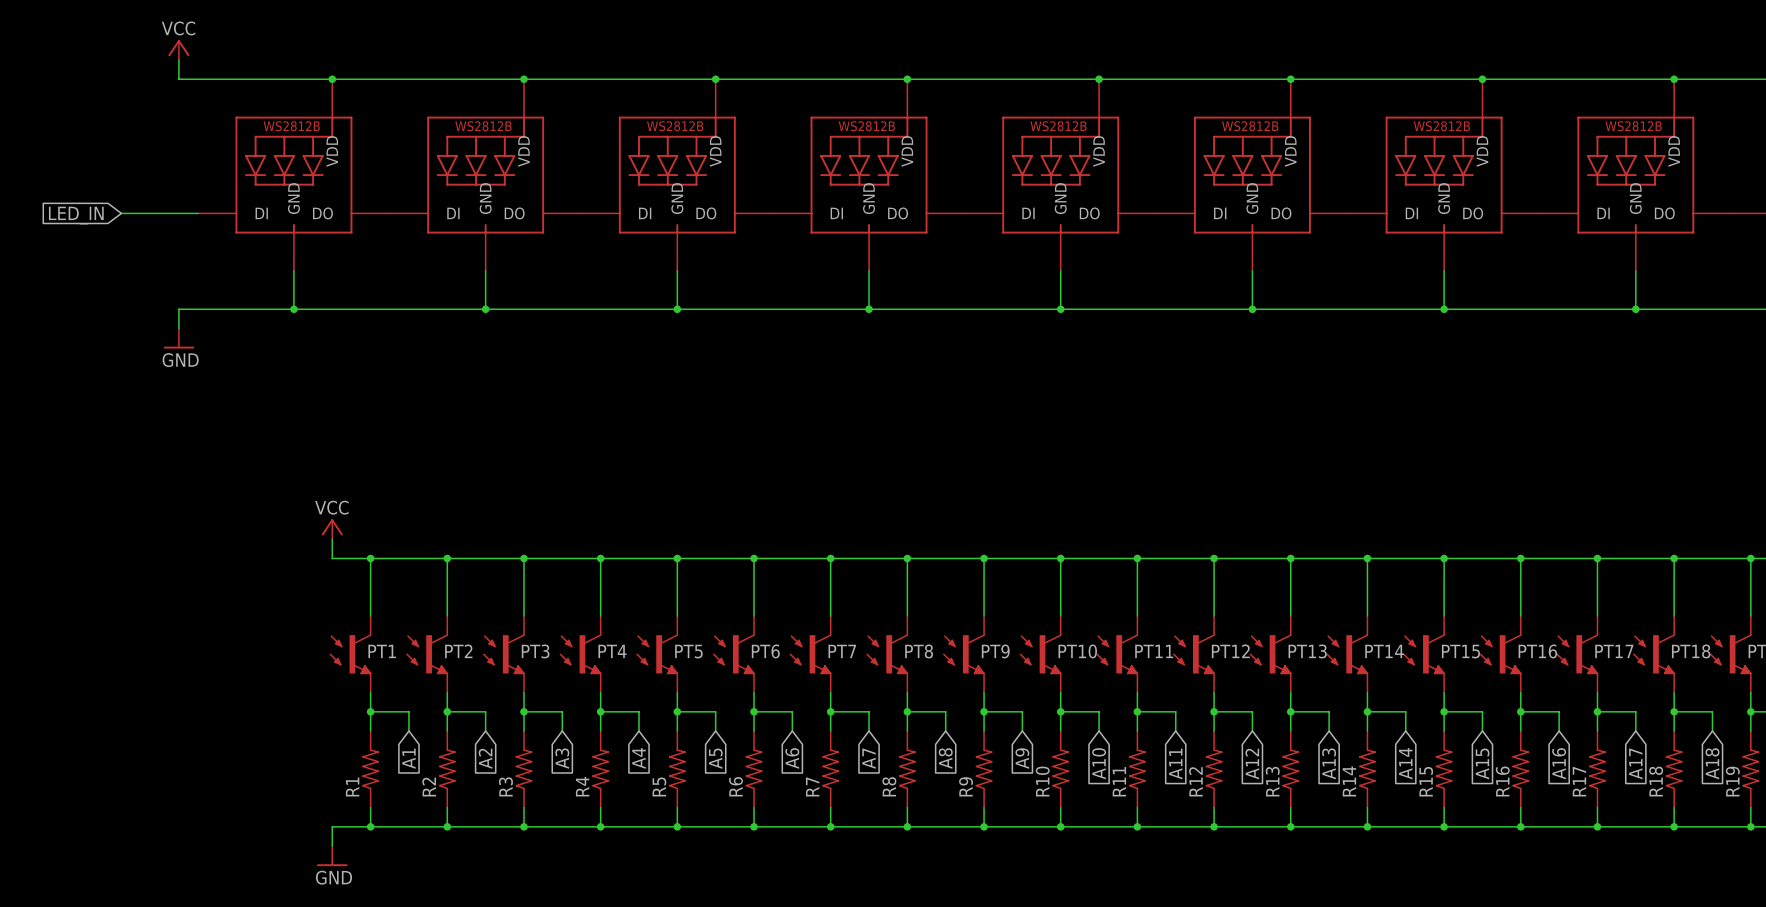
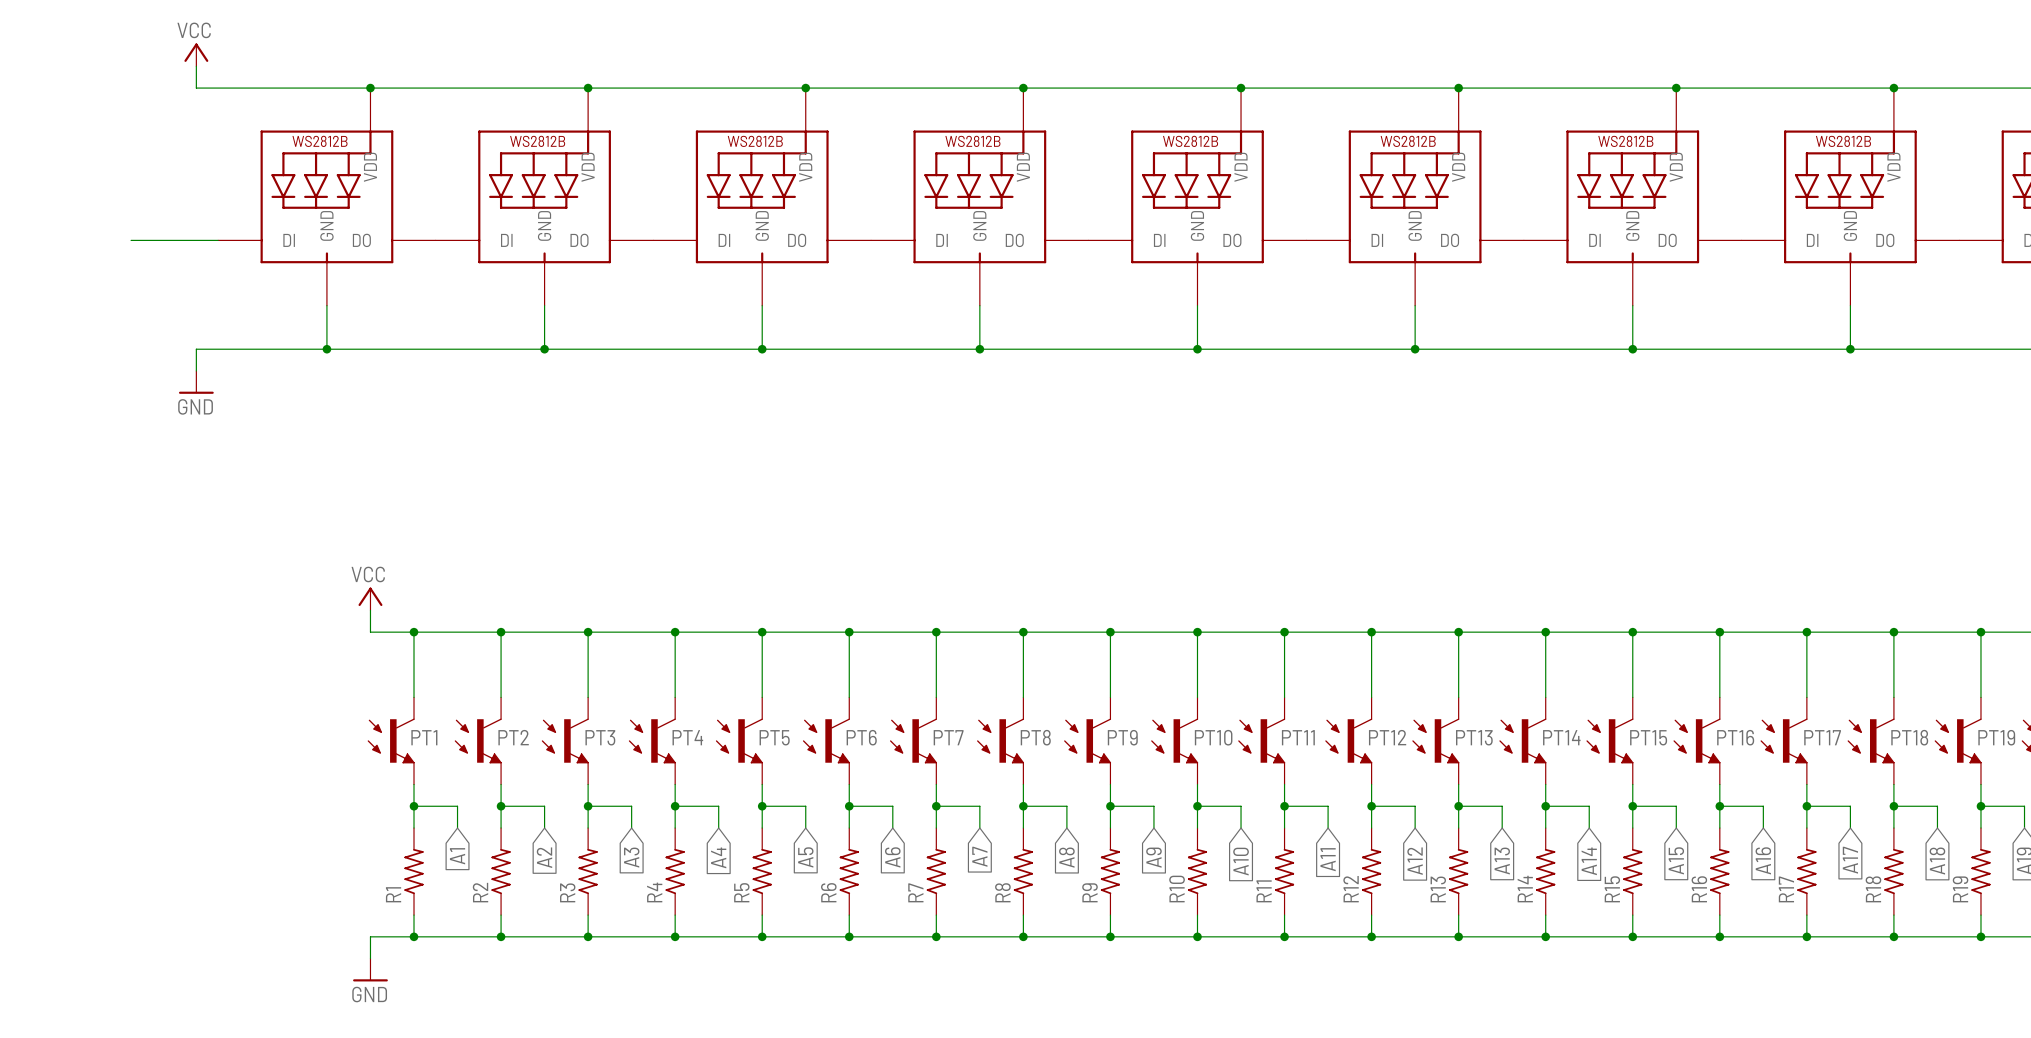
global label: LED_IN (76, 215) -> none

